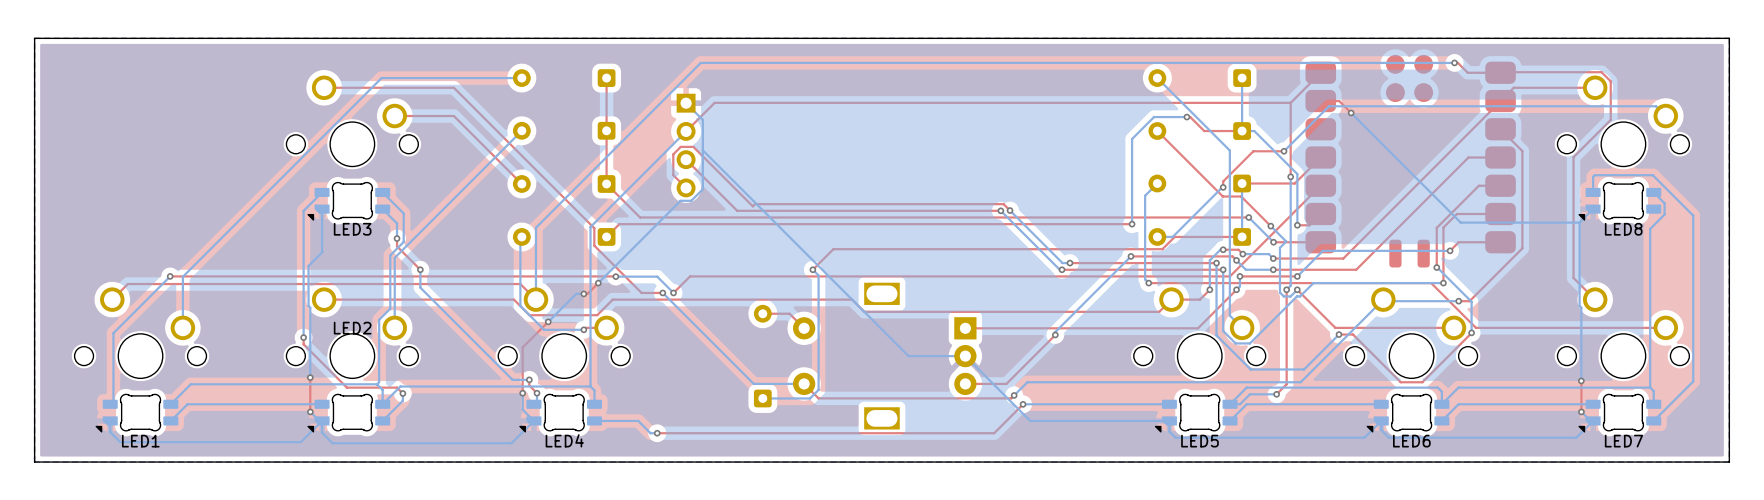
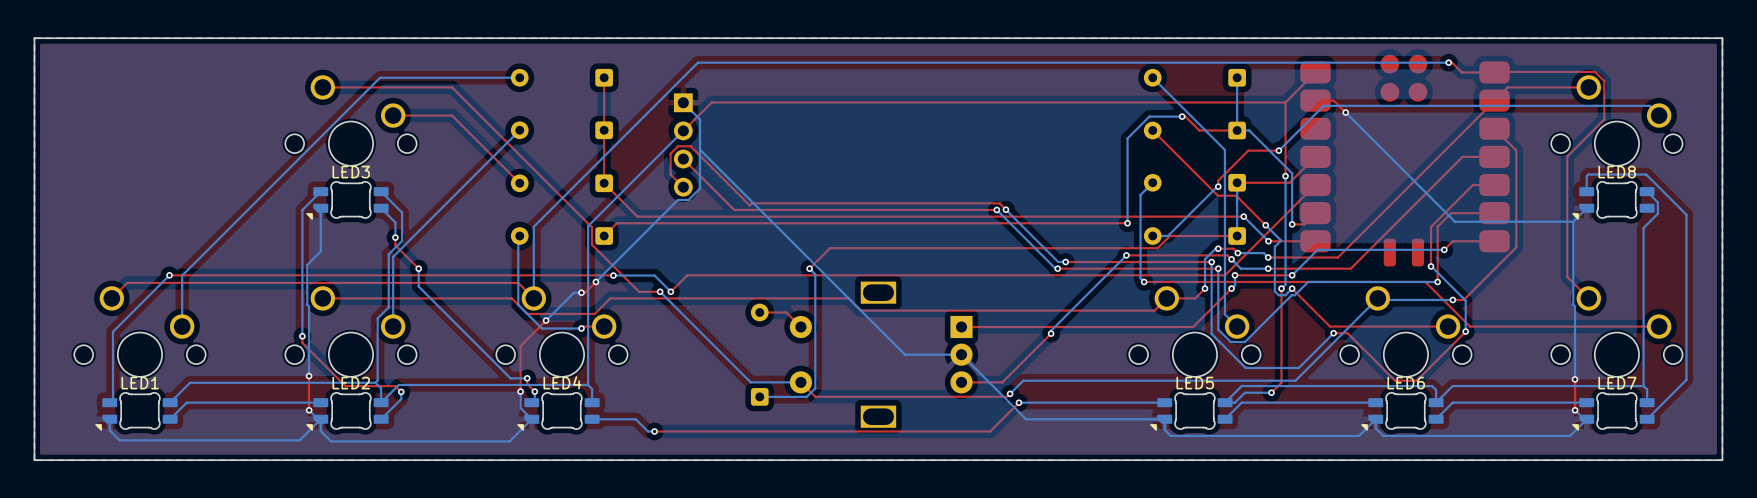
LED3 name position: LED3 (352, 229) -> LED3 (351, 172)
LED8 name position: LED8 (1623, 229) -> LED8 (1617, 172)
LED2 name position: LED2 (352, 328) -> LED2 (351, 383)
LED4 name position: LED4 (564, 440) -> LED4 (562, 382)
LED1 name position: LED1 (140, 441) -> LED1 (140, 383)
LED5 name position: LED5 (1200, 441) -> LED5 (1195, 383)
LED6 name position: LED6 (1411, 441) -> LED6 (1406, 383)
LED7 name position: LED7 (1623, 441) -> LED7 (1617, 383)

